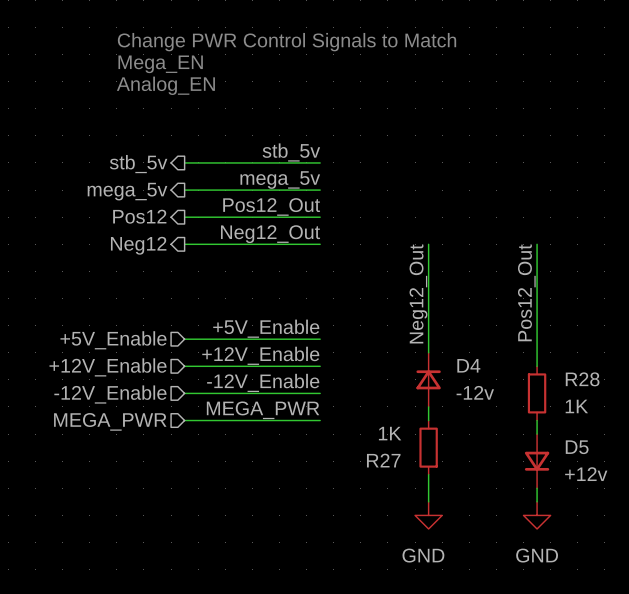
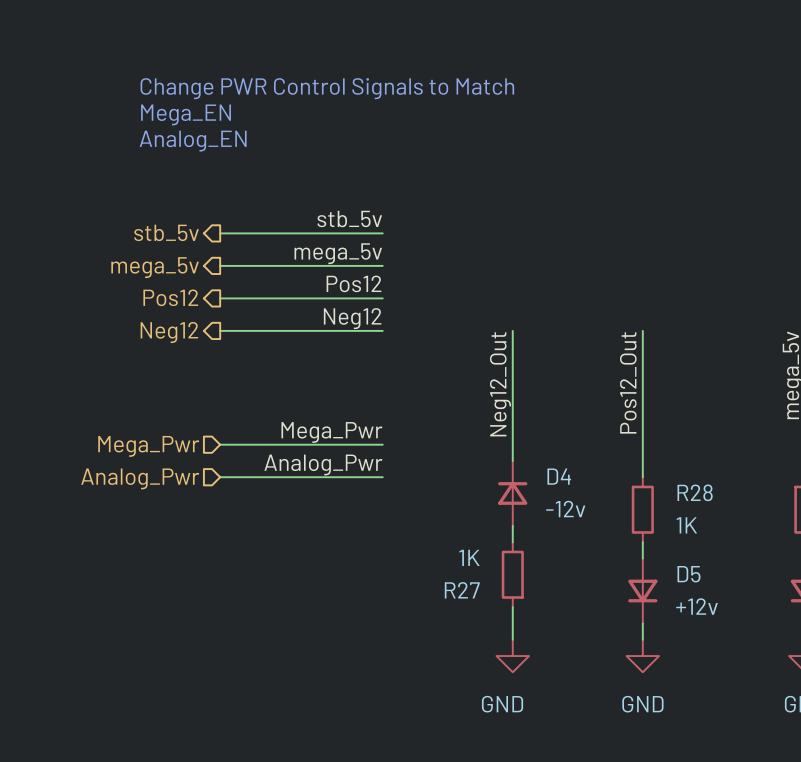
label: Pos12_Out (271, 206) -> Pos12 (353, 283)
label: Neg12_Out (270, 234) -> Neg12 (352, 318)
label: +5V_Enable (266, 328) -> Mega_Pwr (331, 432)
hierarchical label: +5V_Enable (113, 340) -> Mega_Pwr (148, 446)
label: +12V_Enable (260, 355) -> Analog_Pwr (323, 465)
hierarchical label: +12V_Enable (108, 367) -> Analog_Pwr (140, 478)
label: -12V_Enable (263, 382) -> none
wire: (184, 393) (320, 393) -> none
hierarchical label: -12V_Enable (110, 394) -> none
label: MEGA_PWR (263, 410) -> none
wire: (184, 420) (320, 420) -> none
hierarchical label: MEGA_PWR (110, 421) -> none

